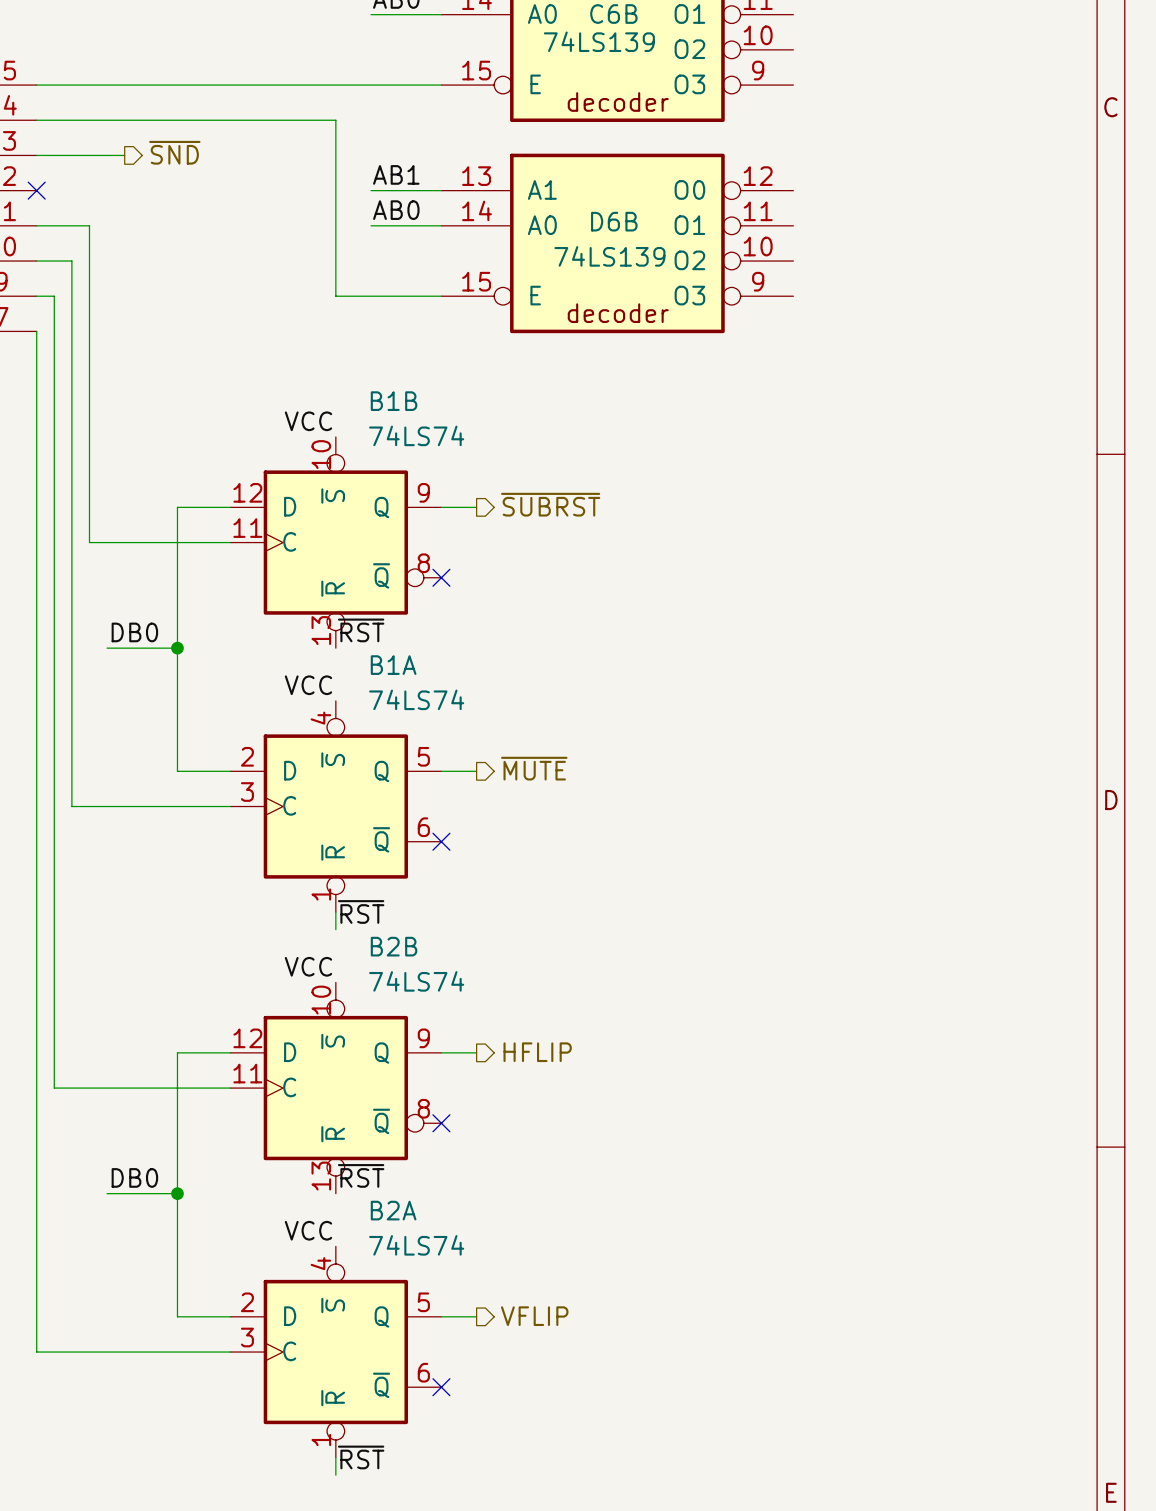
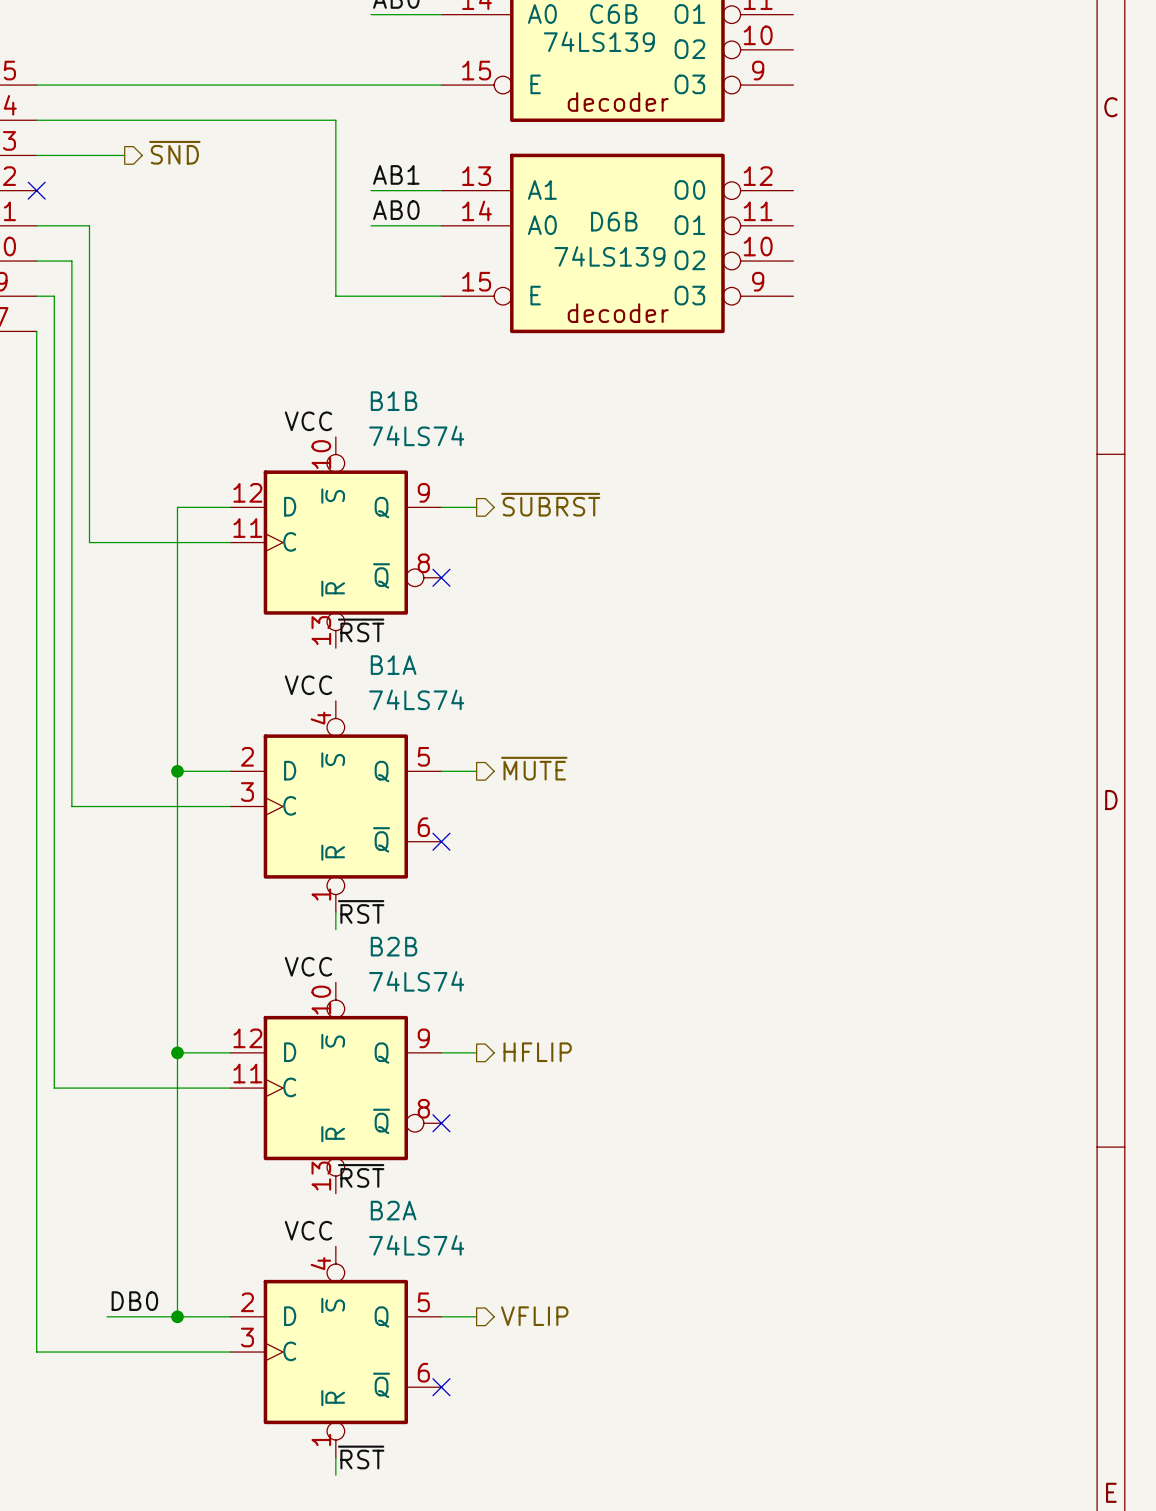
label: DB0 (134, 632) -> none
wire: (107, 648) (177, 648) -> none
junction: (177, 648) -> none
wire: none -> (177, 771) (177, 1052)
junction: none -> (177, 771)
junction: none -> (177, 1052)
label position: DB0 (134, 1177) -> DB0 (134, 1301)
wire: (107, 1193) (177, 1193) -> (107, 1316) (177, 1316)
junction: (177, 1193) -> none
junction: none -> (177, 1316)

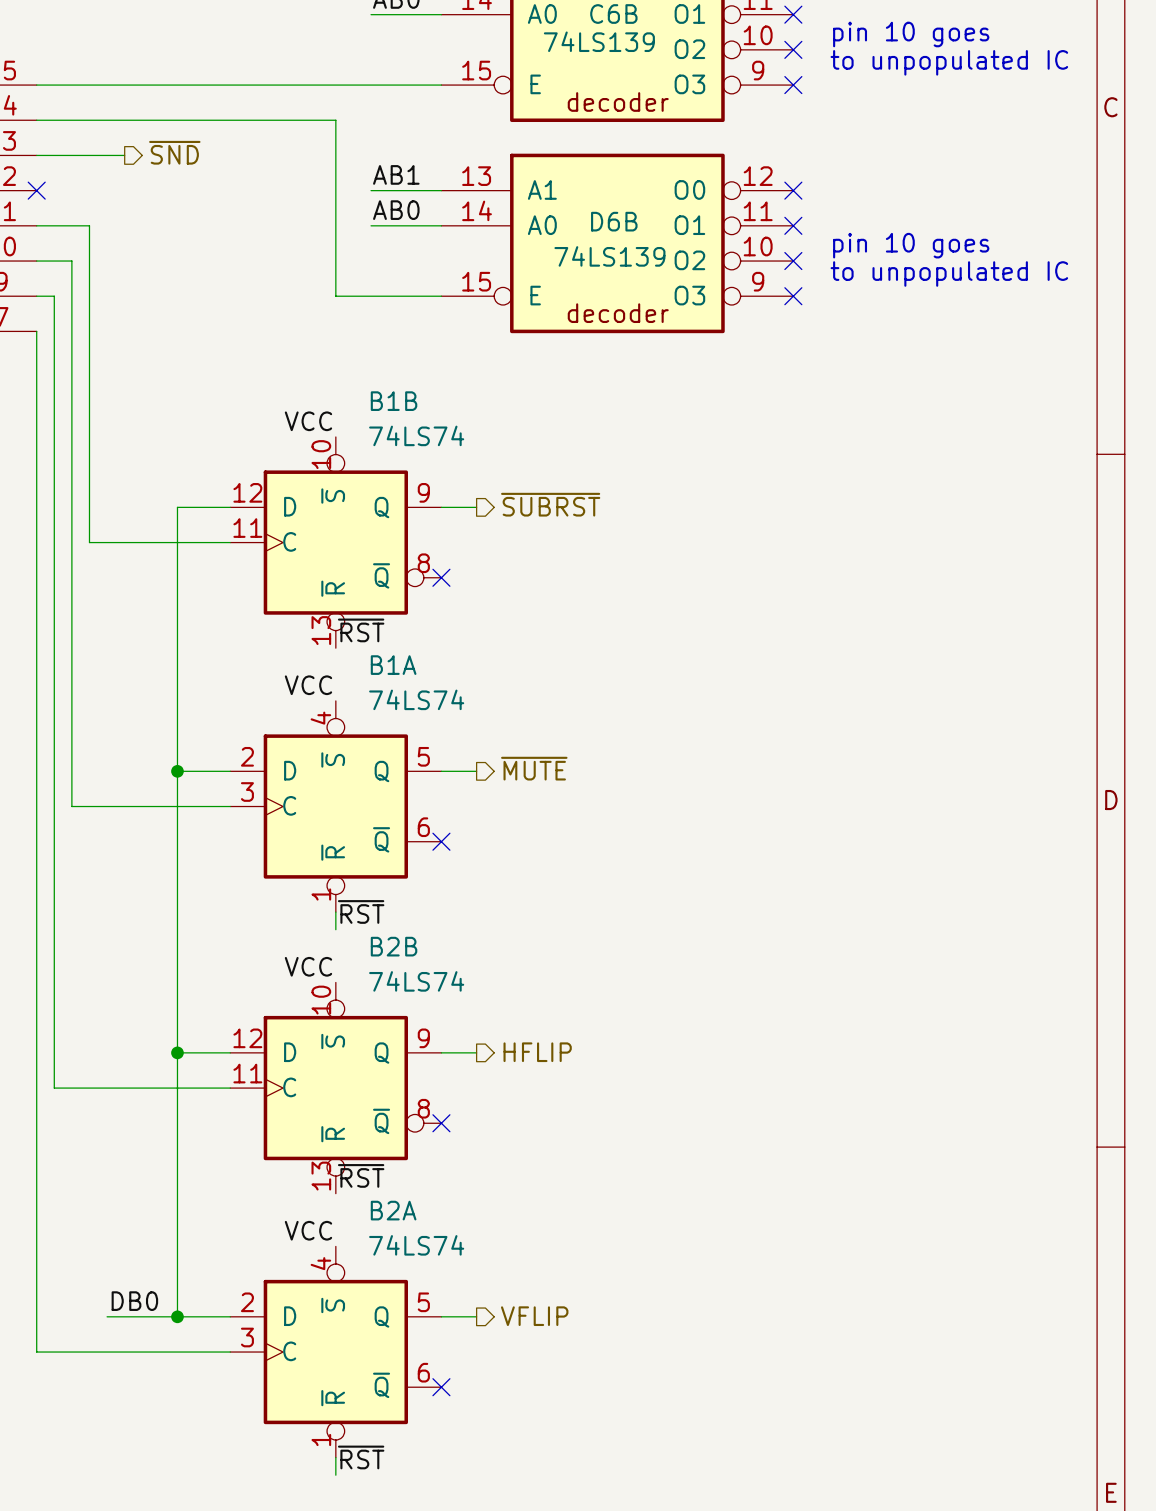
no-connect mark: none -> (793, 14)
text: none -> pin 10 goes (911, 34)
no-connect mark: none -> (793, 49)
text: none -> to unpopulated IC (949, 62)
no-connect mark: none -> (793, 85)
no-connect mark: none -> (793, 190)
no-connect mark: none -> (793, 225)
text: none -> pin 10 goes (911, 245)
no-connect mark: none -> (793, 261)
text: none -> to unpopulated IC (949, 274)
no-connect mark: none -> (793, 296)

